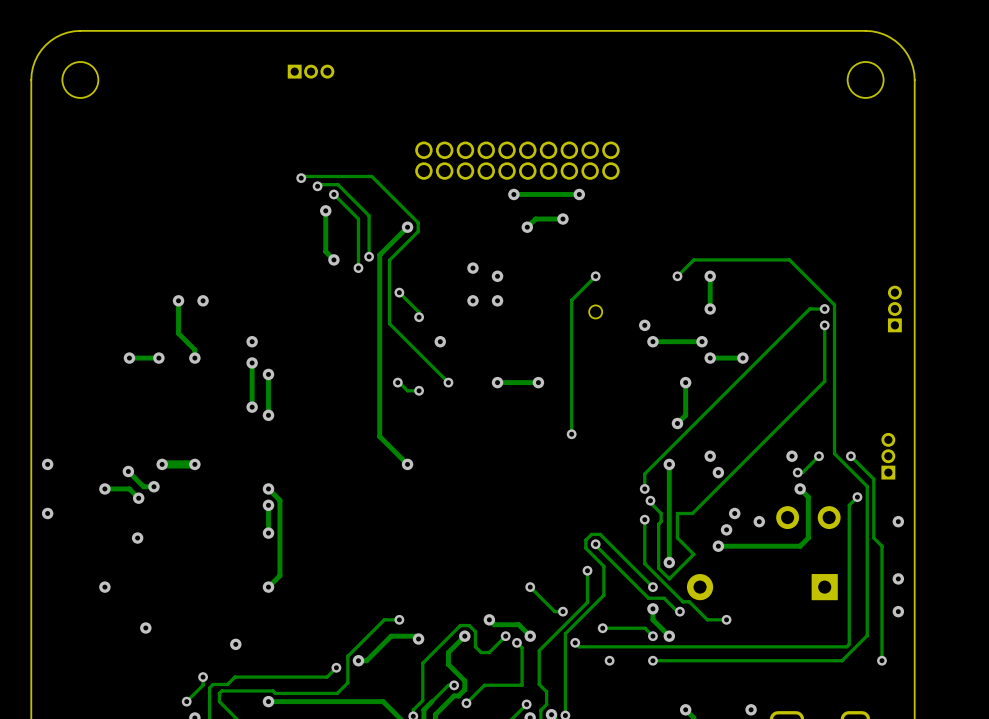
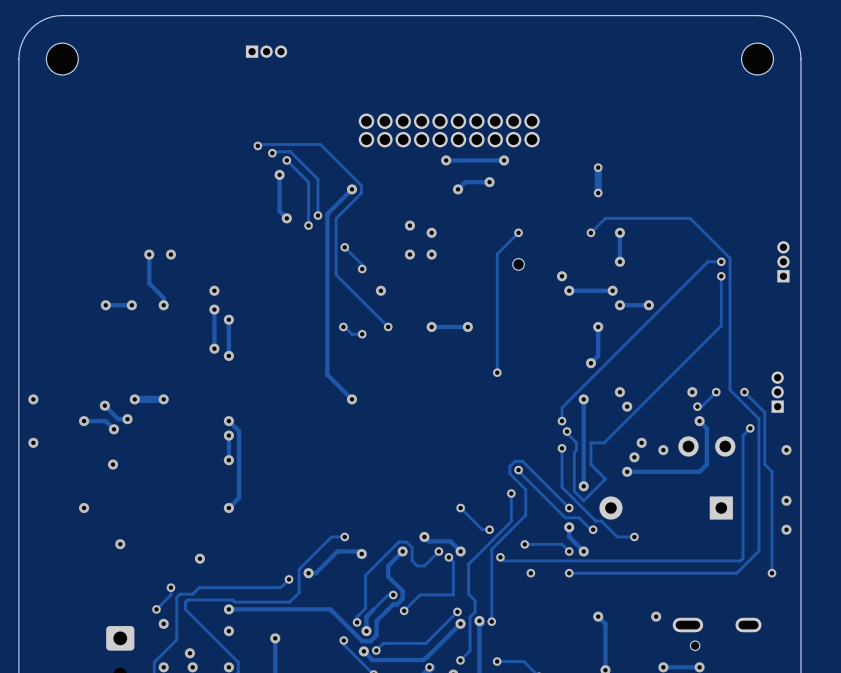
track: none -> (598, 167) (598, 193)
via: none -> (598, 167)
via: none -> (598, 193)

